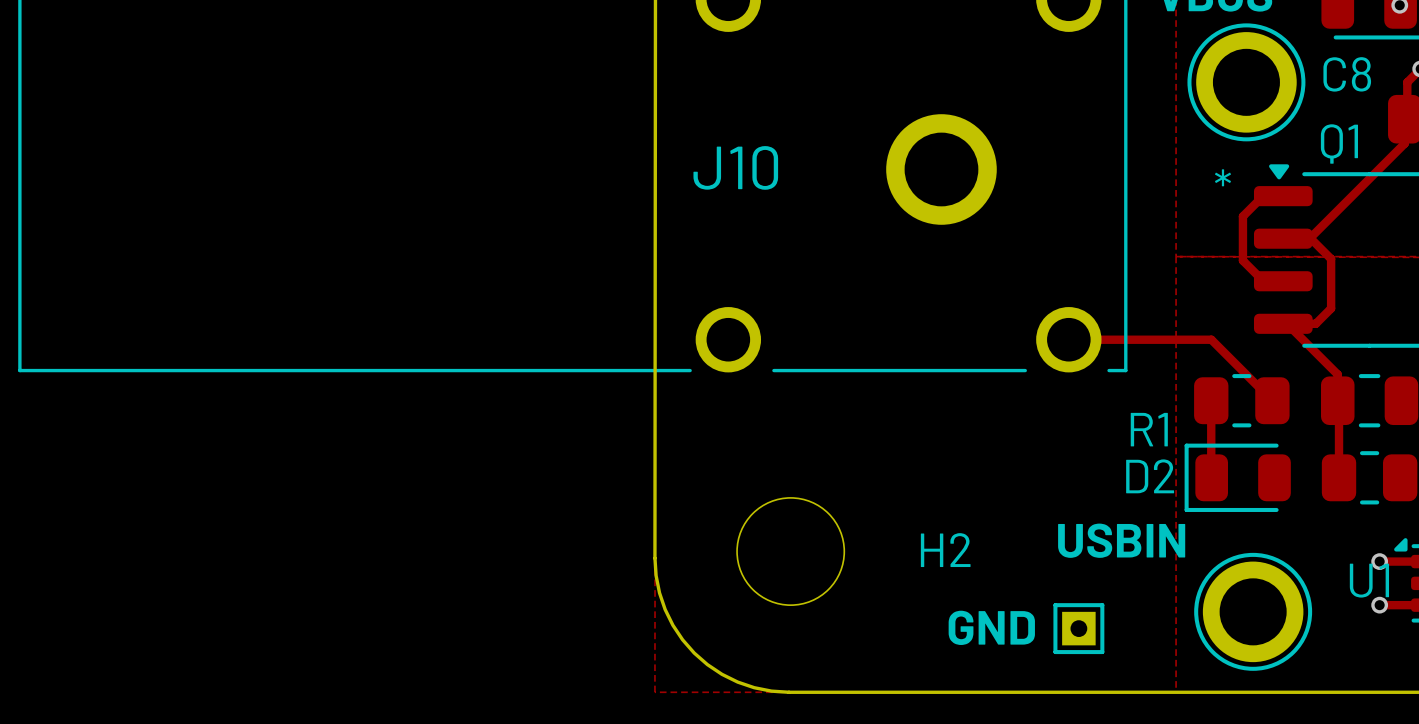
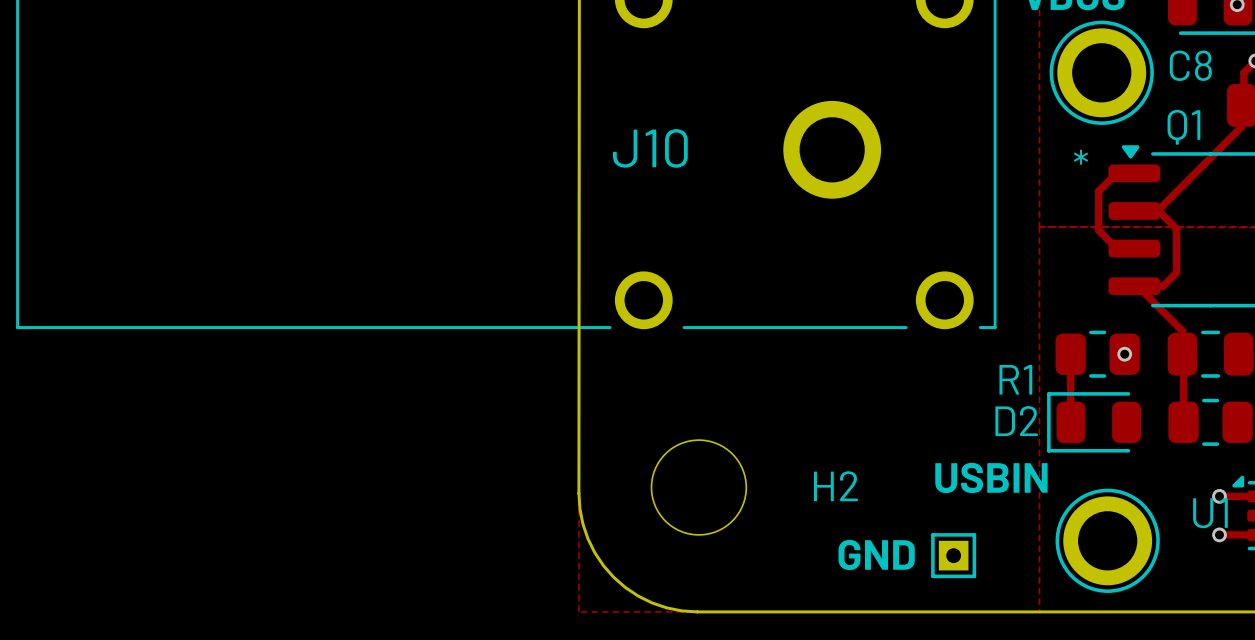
track: (1068, 339) (1211, 339) (1272, 400) -> none
via: none -> (1124, 354)

